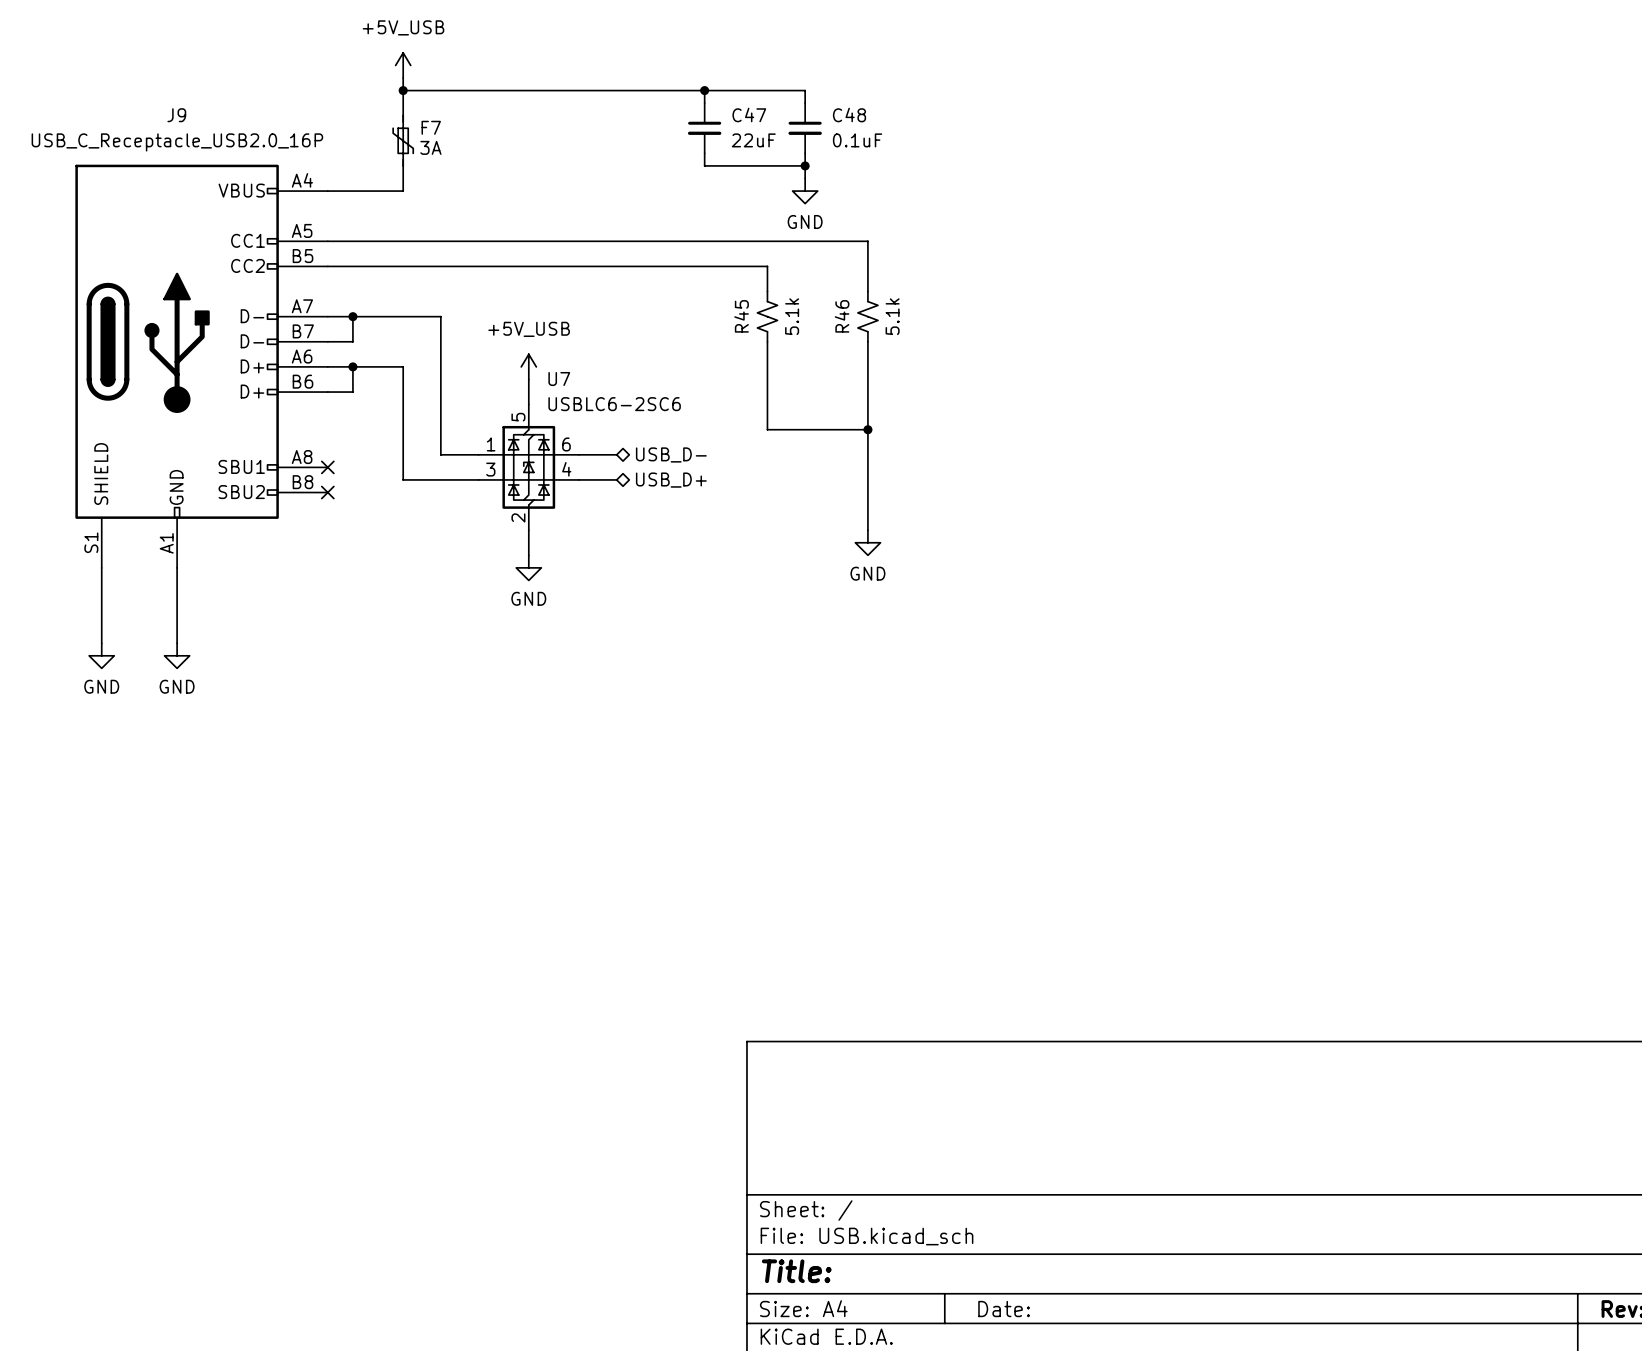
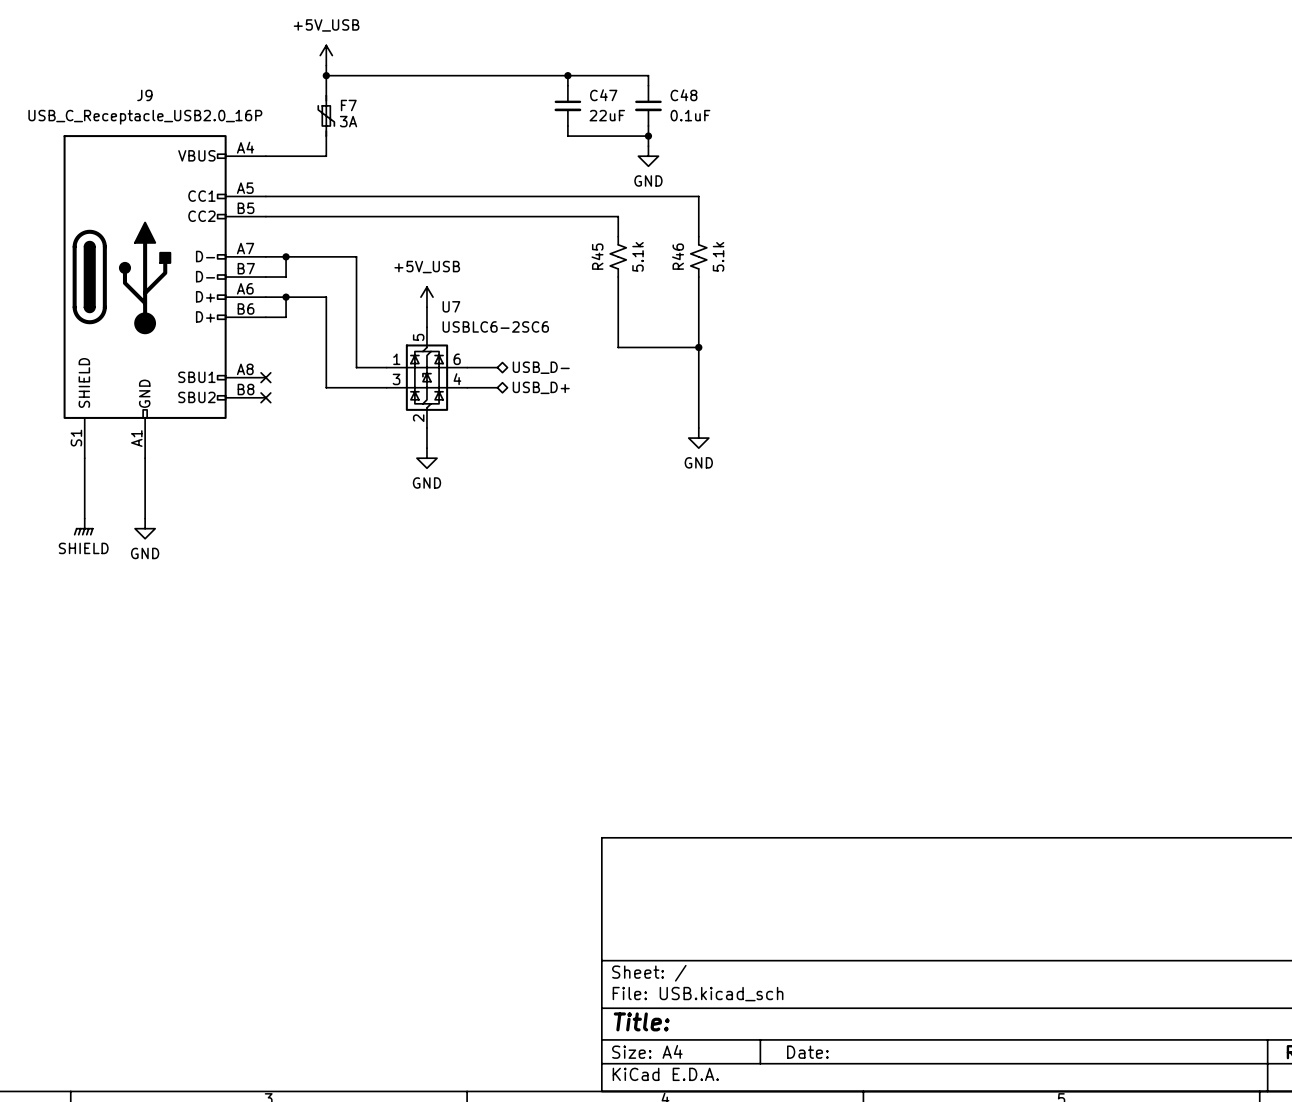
power symbol: GND (101, 655) -> SHIELD (83, 527)

